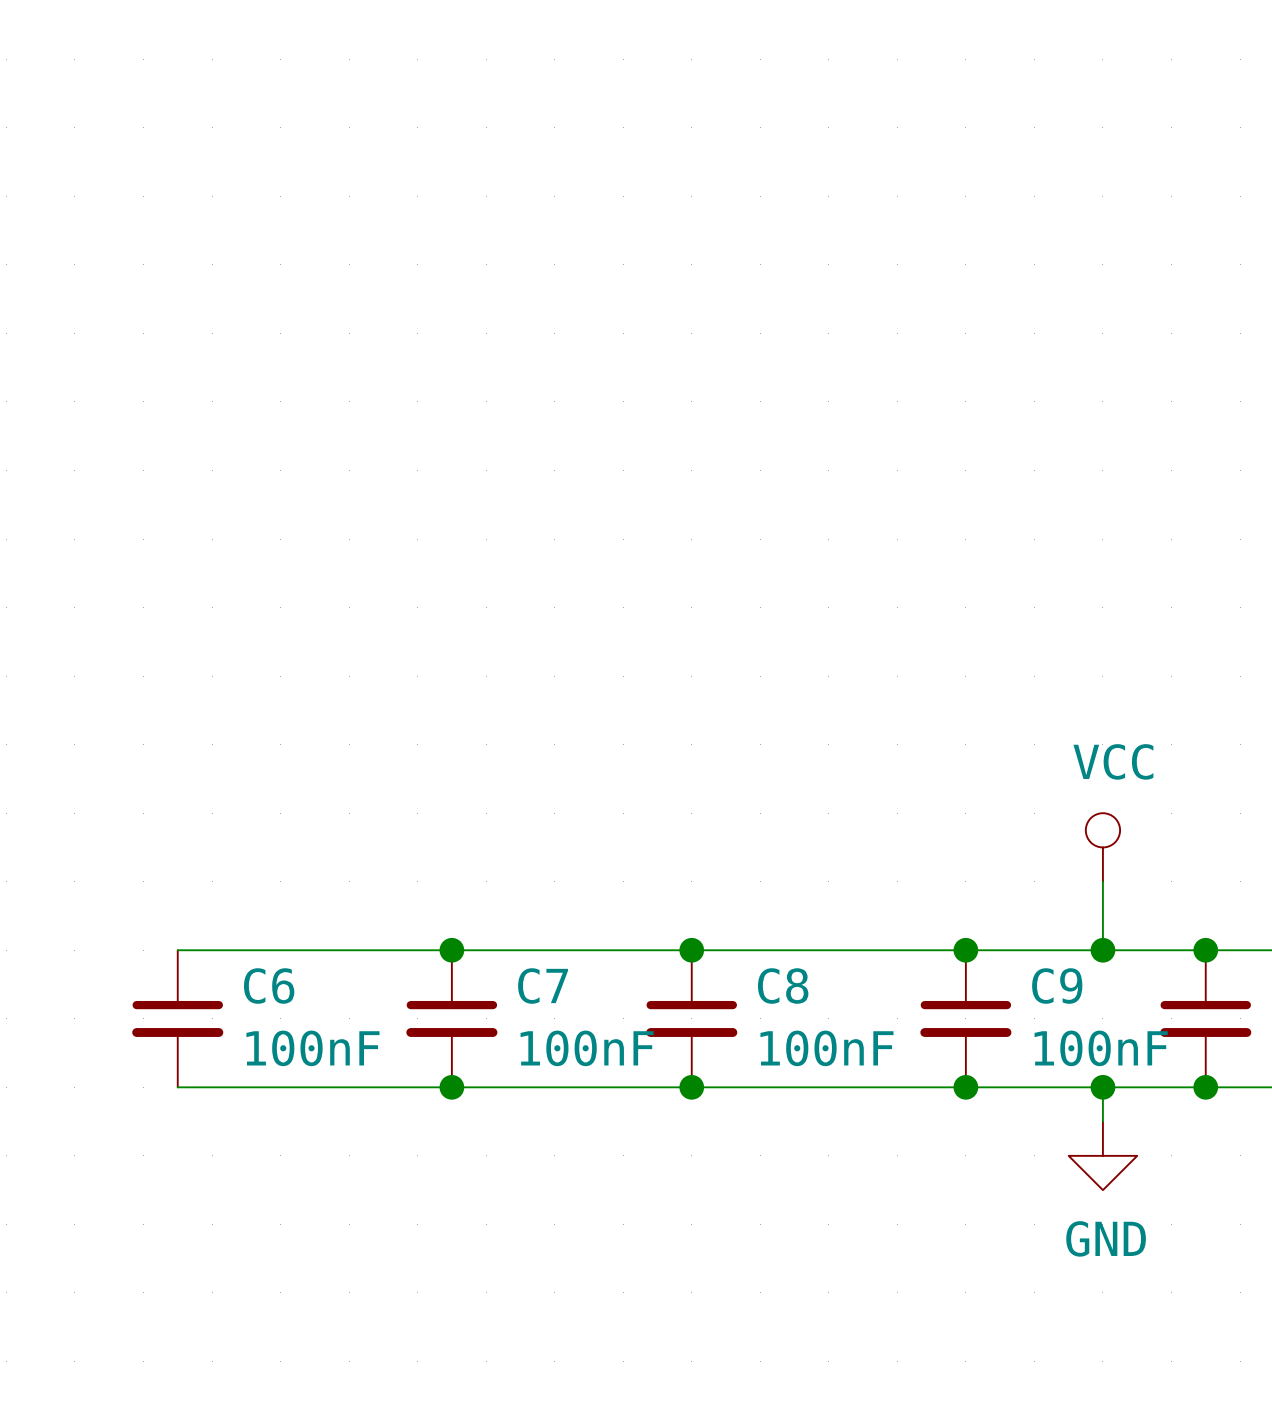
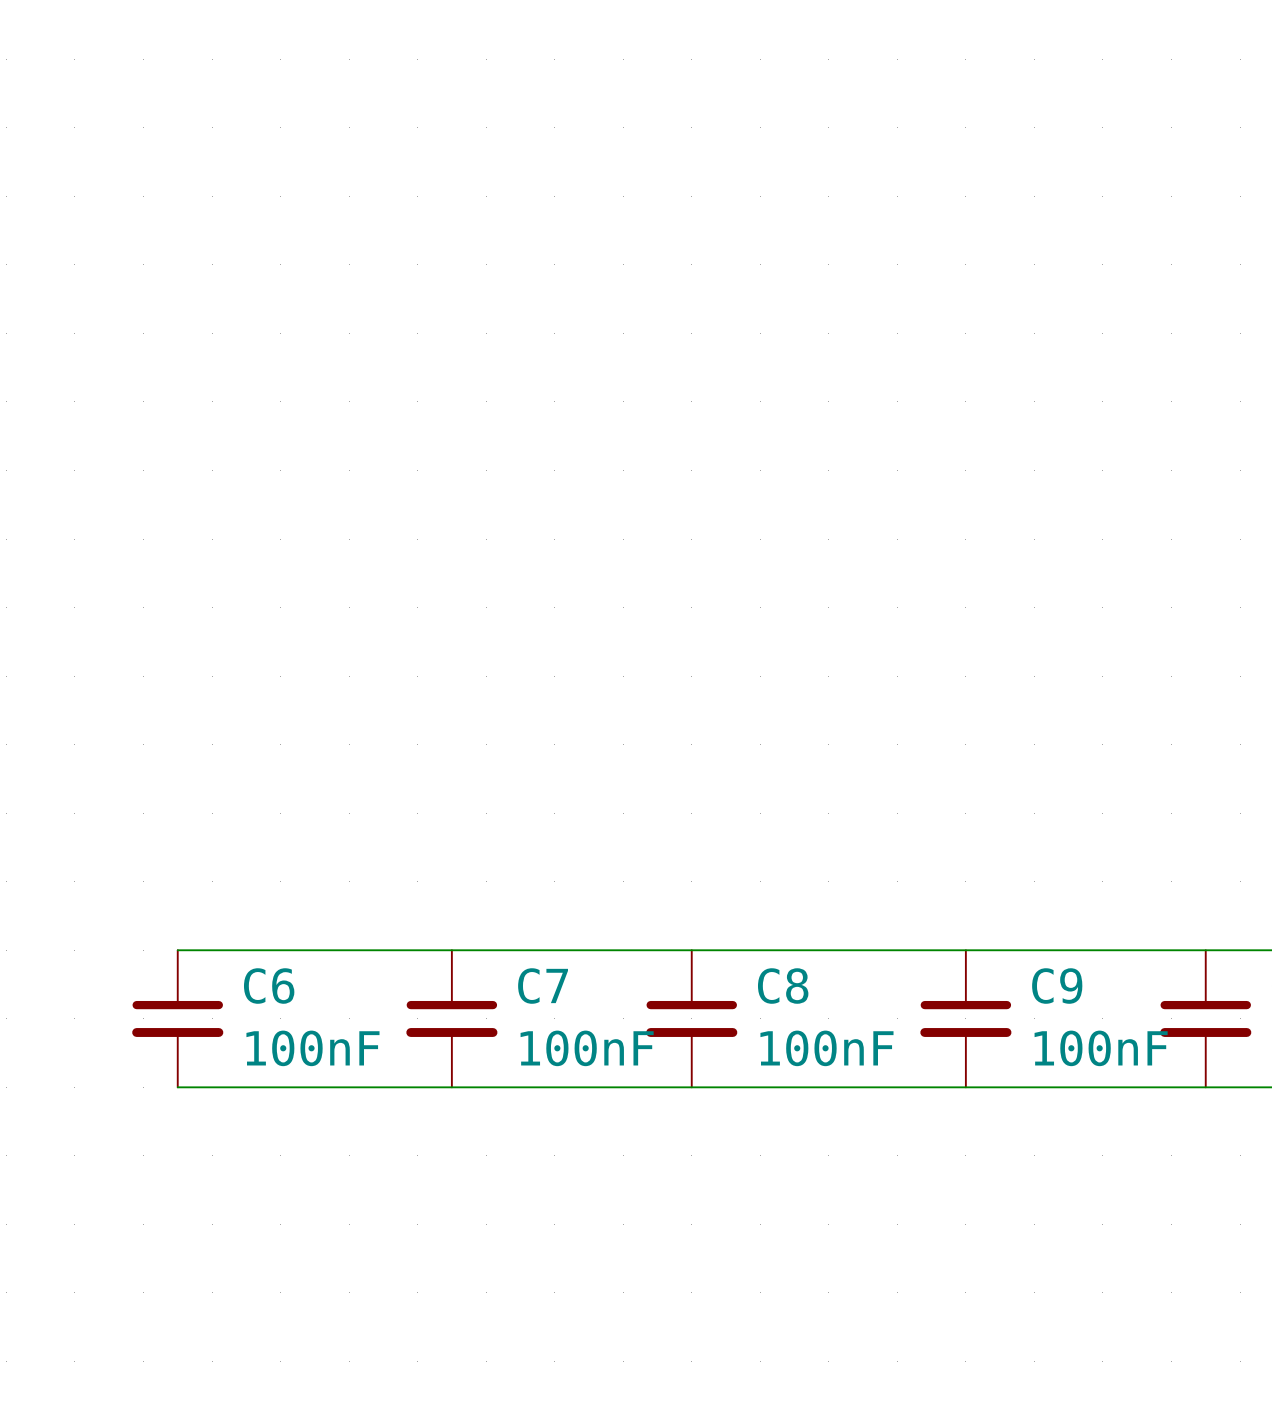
power symbol: VCC (1102, 847) -> none
wire: (1102, 881) (1102, 950) -> none
junction: (451, 950) -> none
junction: (691, 950) -> none
junction: (965, 950) -> none
junction: (1102, 950) -> none
junction: (1205, 950) -> none
junction: (451, 1087) -> none
junction: (691, 1087) -> none
junction: (965, 1087) -> none
wire: (1102, 1087) (1102, 1121) -> none
junction: (1102, 1087) -> none
junction: (1205, 1087) -> none
power symbol: GND (1102, 1155) -> none

